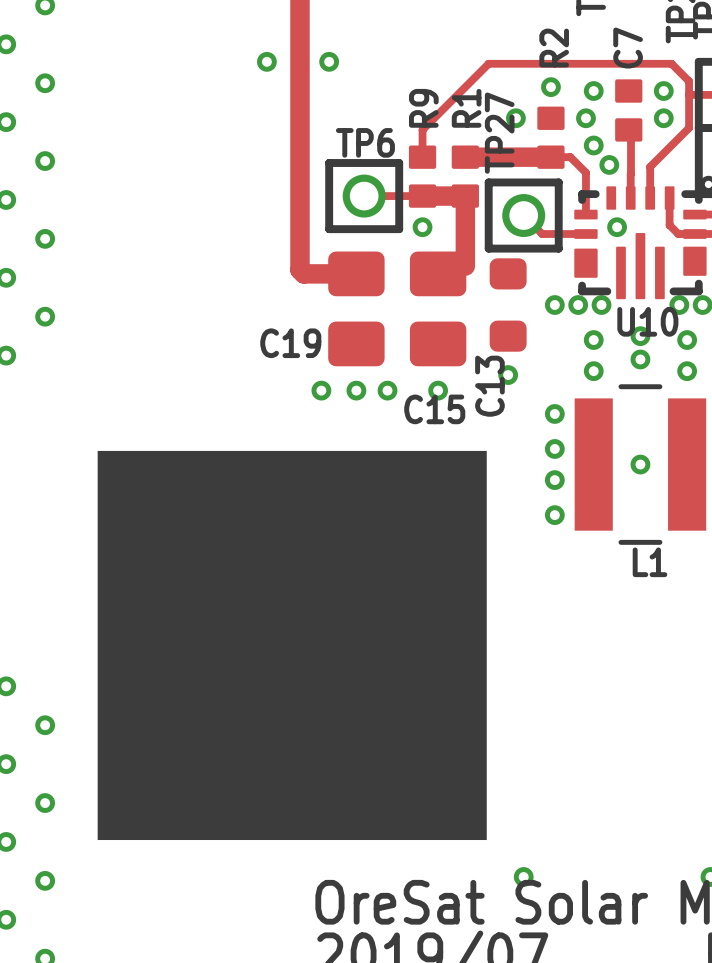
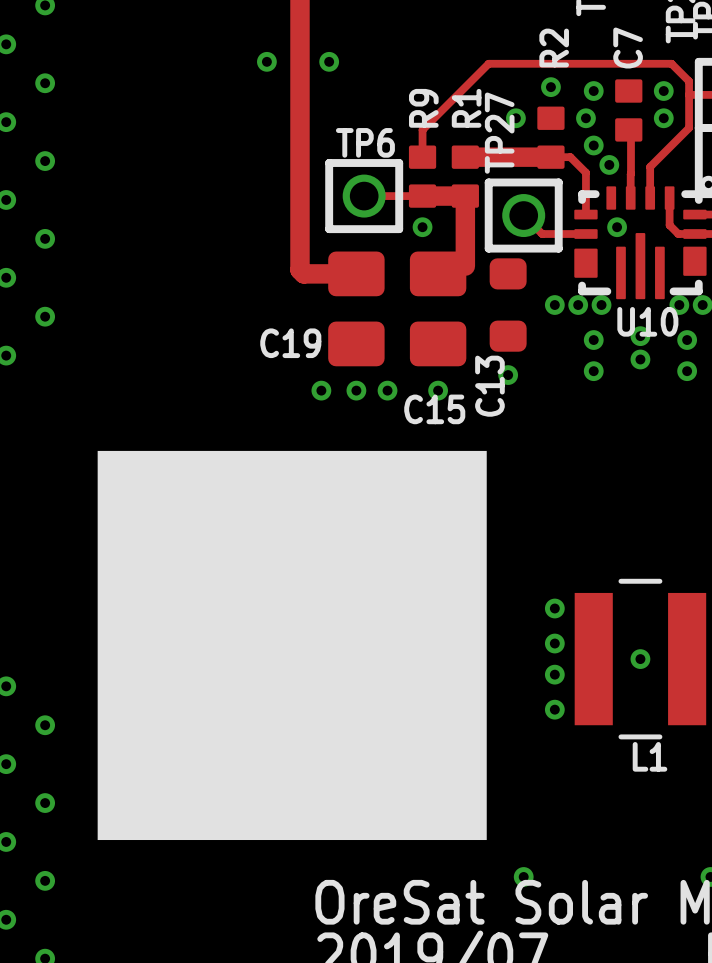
via: (554, 413) -> none
via: (554, 448) -> none
L1 position: (640, 464) -> (640, 659)
via: (640, 464) -> none
via: (554, 480) -> none
via: (554, 515) -> none
via: none -> (554, 608)
via: none -> (554, 643)
via: none -> (640, 659)
via: none -> (554, 674)
via: none -> (554, 709)

